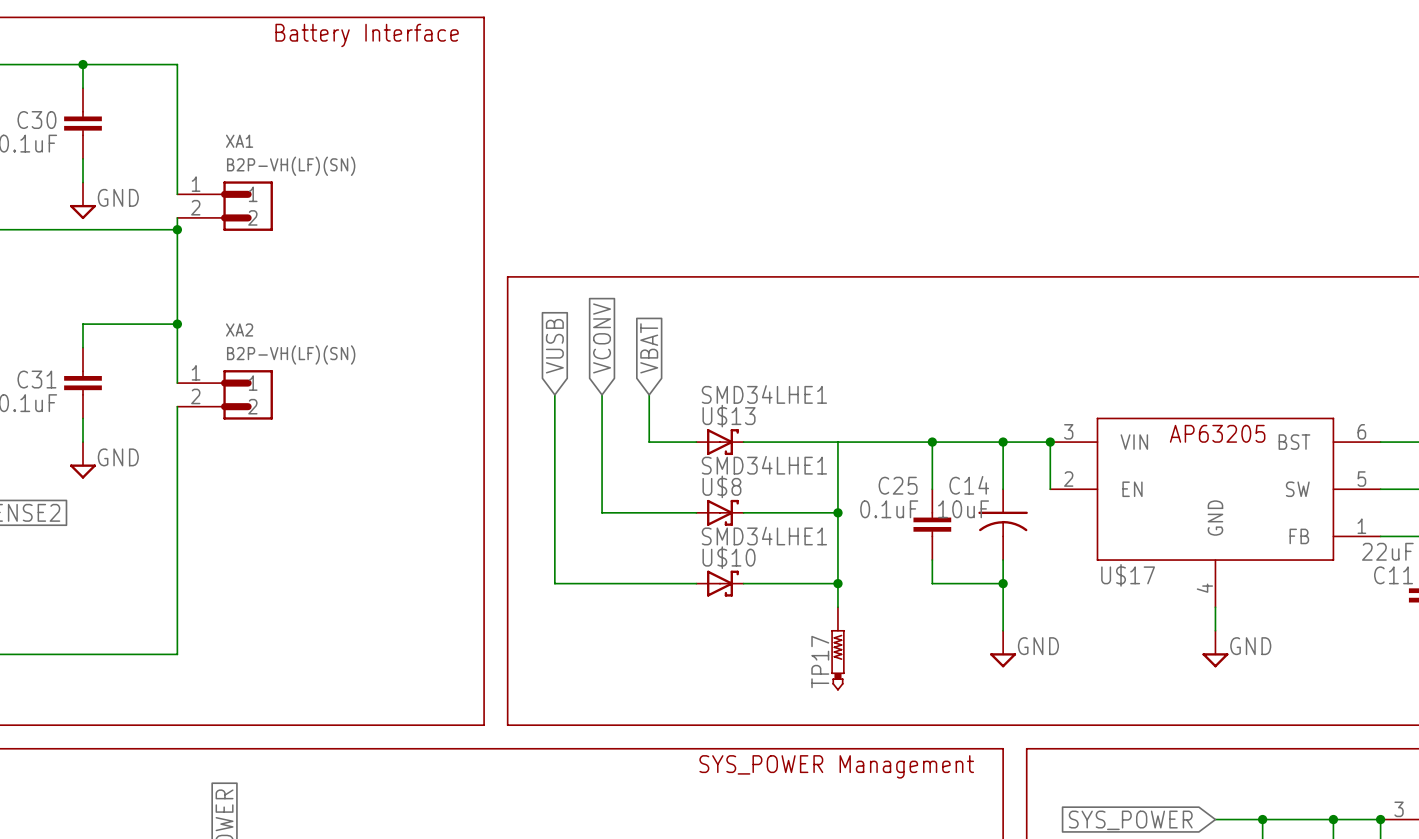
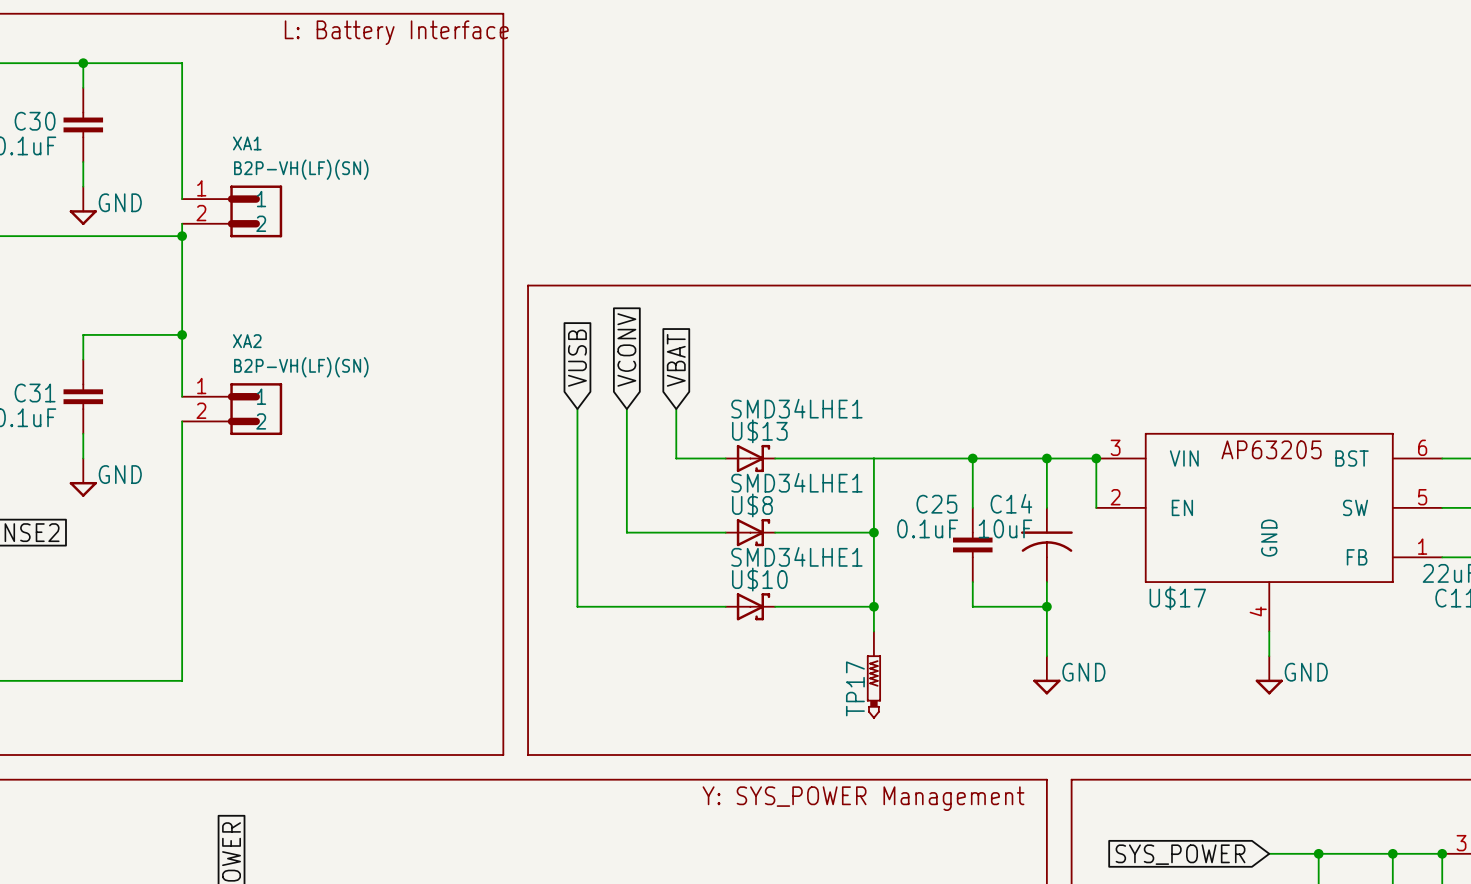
text: Battery Interface (367, 35) -> L: Battery Interface (396, 32)
text: SYS_POWER Management (836, 766) -> Y: SYS_POWER Management (863, 798)

